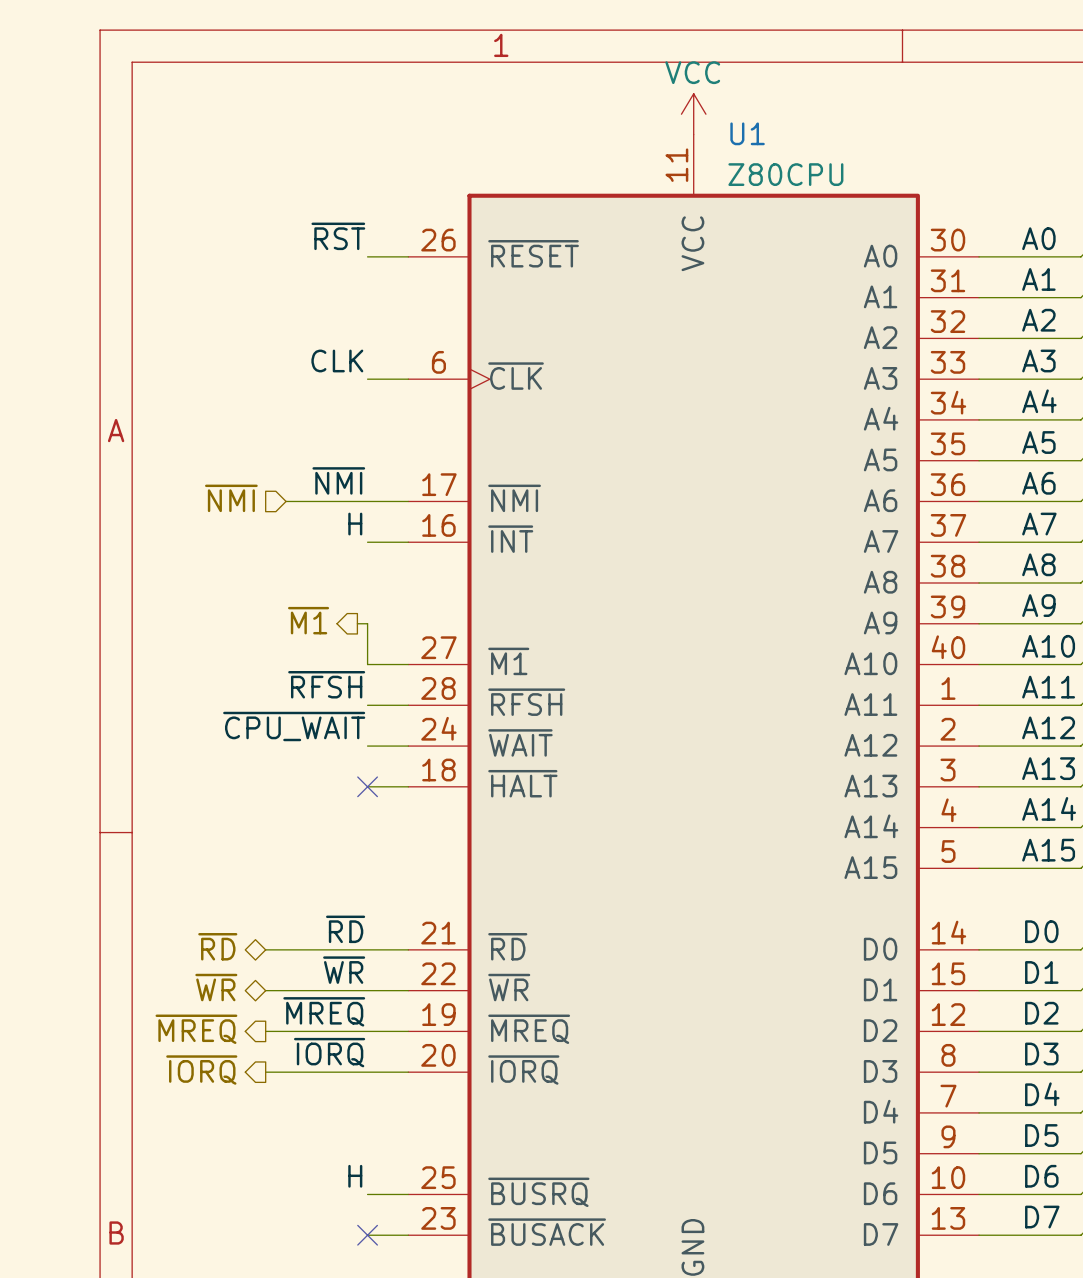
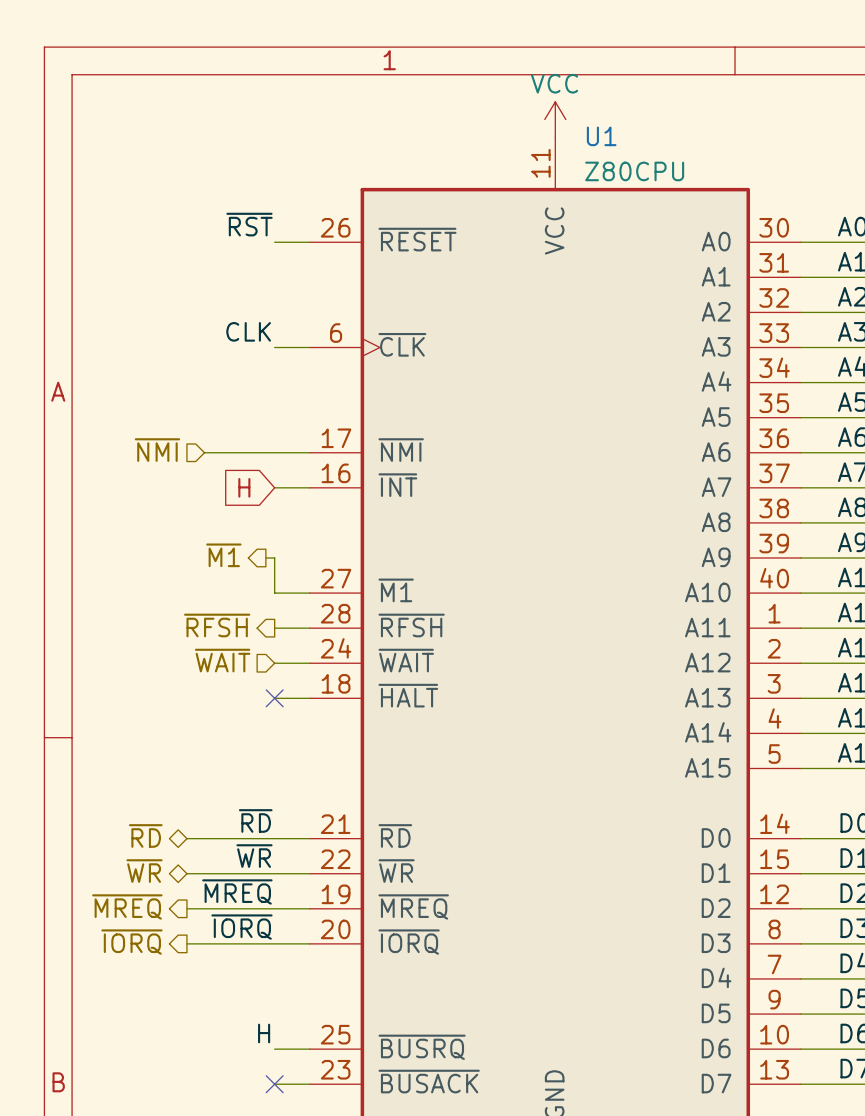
label: ~{NMI} (338, 480) -> none
label: H (355, 524) -> none
global label: none -> H (244, 487)
label: ~{RFSH} (326, 684) -> none
hierarchical label: none -> ~{RFSH} (217, 625)
label: ~{CPU_WAIT} (294, 726) -> none
hierarchical label: none -> ~{WAIT} (222, 660)

